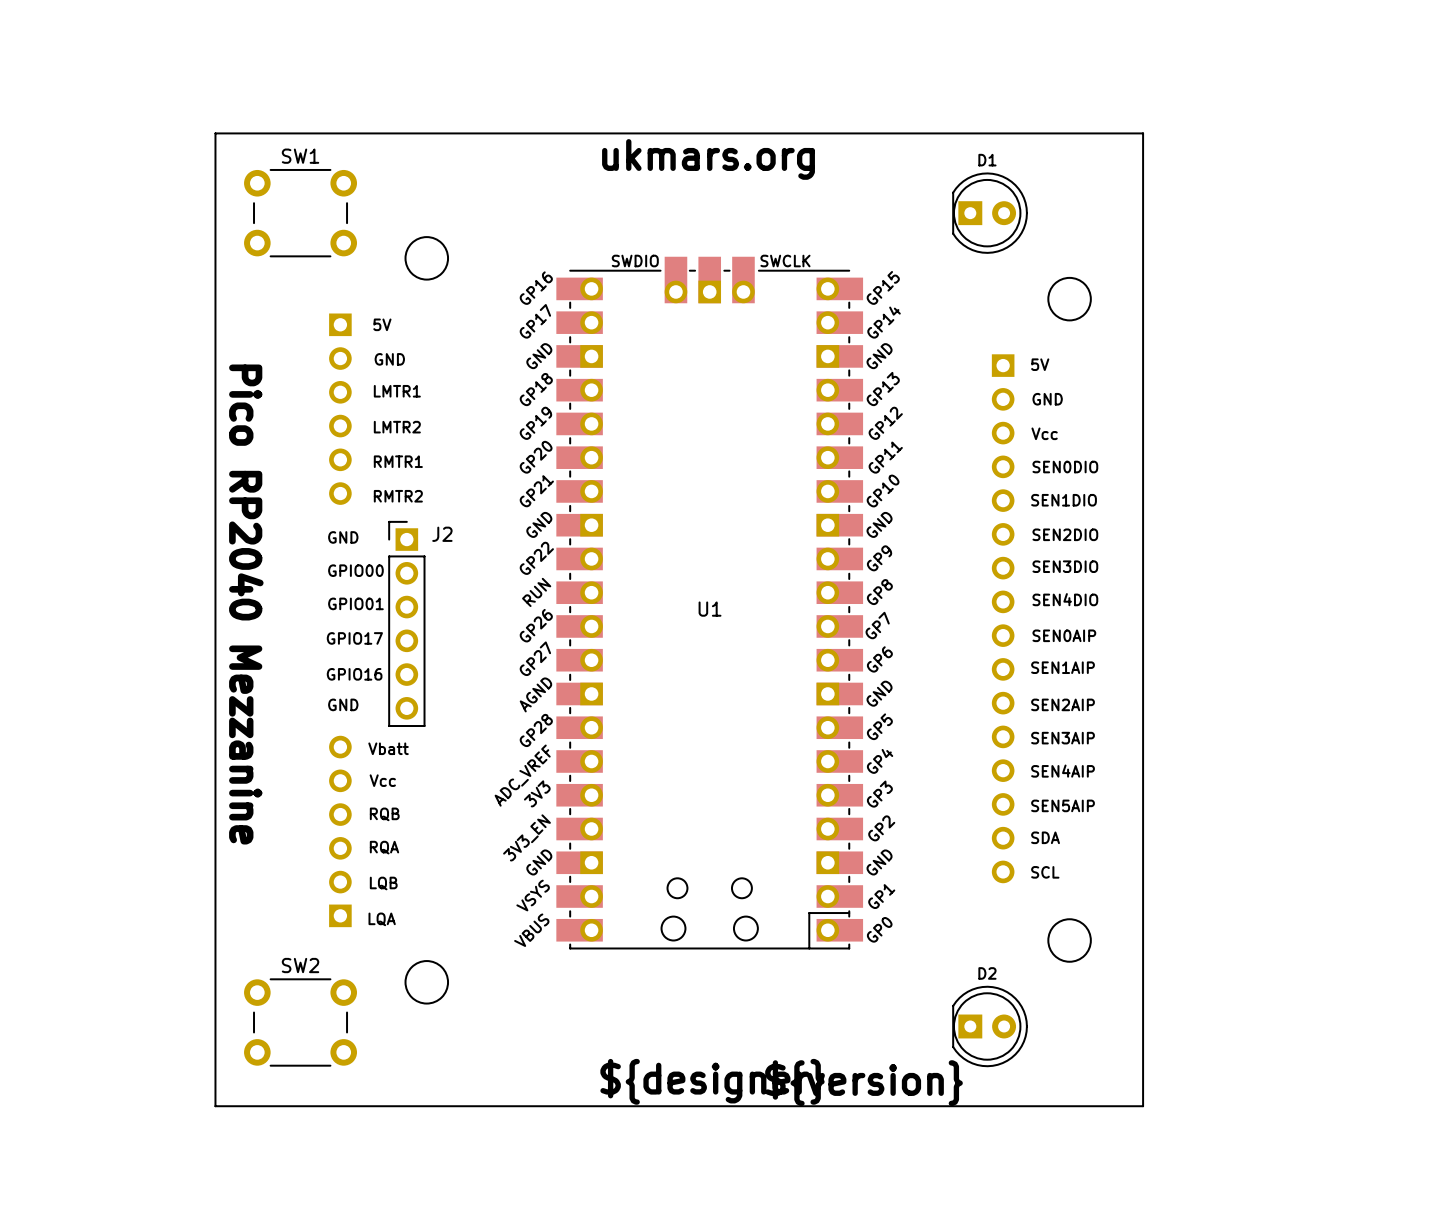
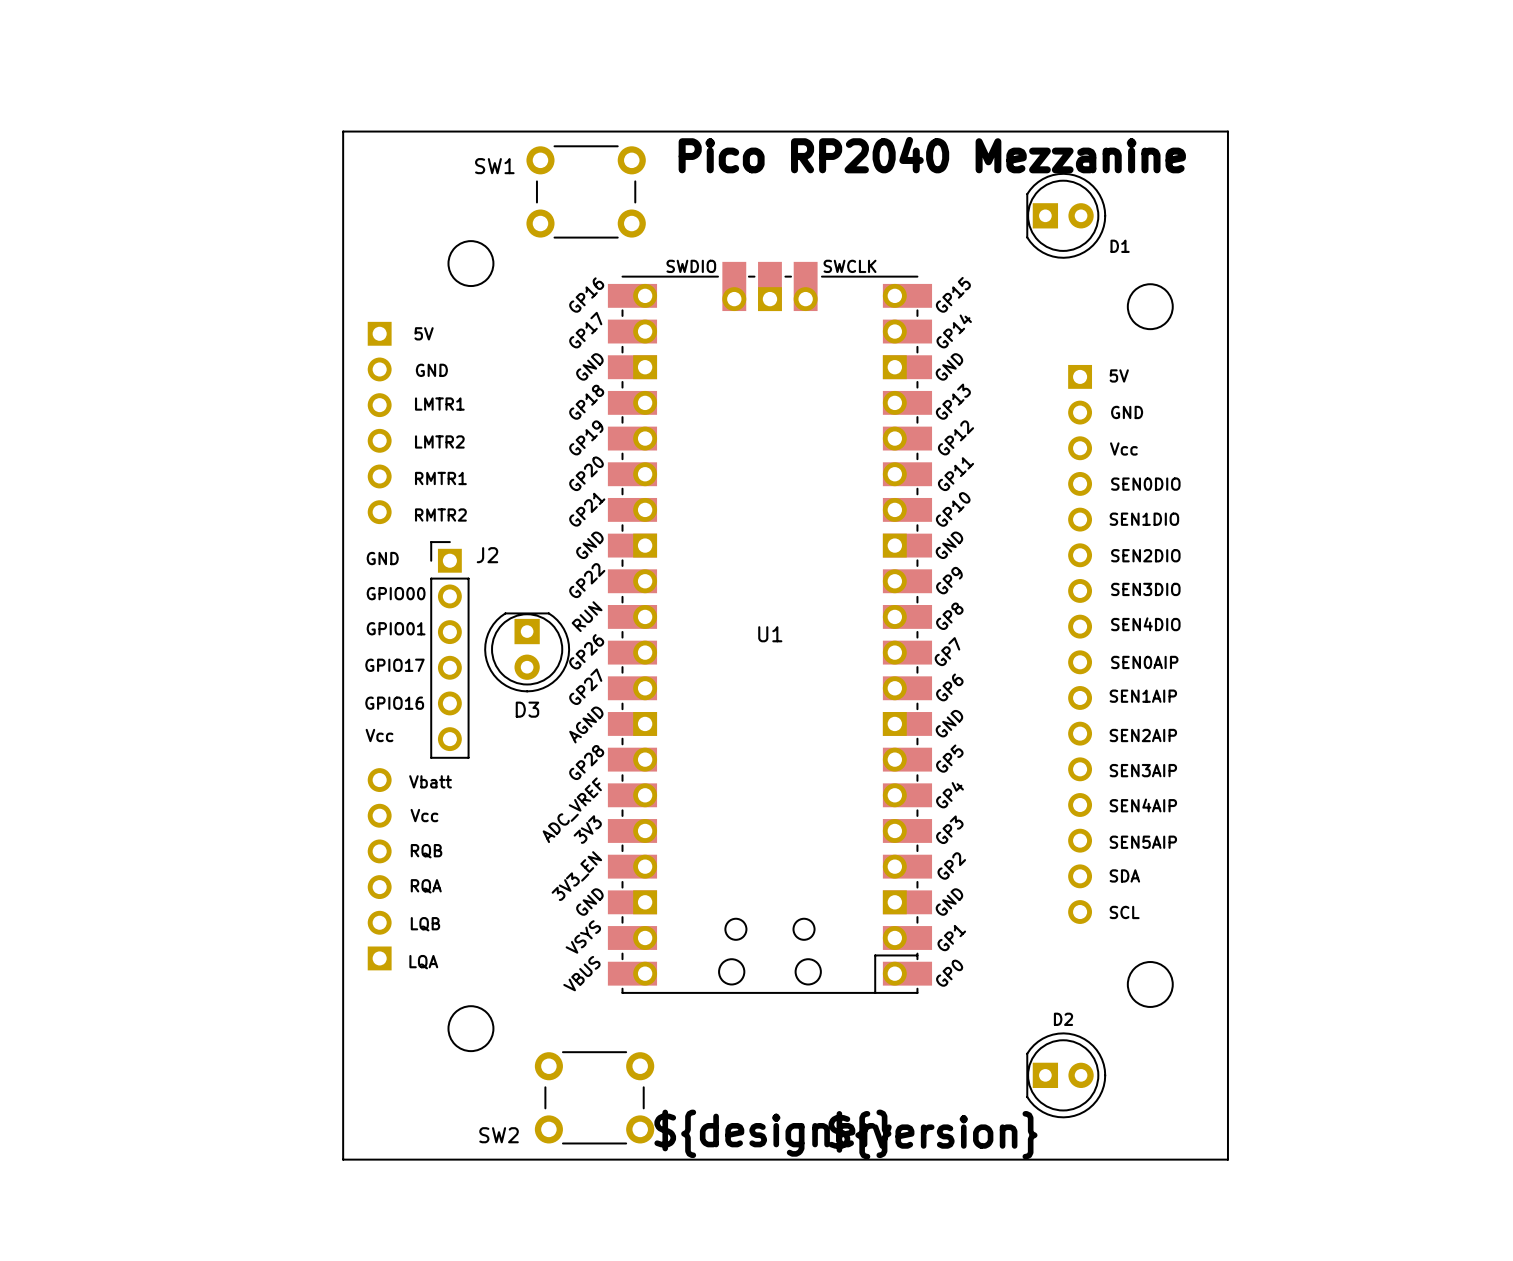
board edge: (305, 133) (215, 133) (215, 1106) (305, 1106) -> (343, 131) (343, 1159)
text: none -> Pico RP2040 Mezzanine (932, 155)
SW1 name position: SW1 (300, 156) -> SW1 (494, 166)
text: ukmars.org (708, 159) -> none
D1 name position: D1 (987, 160) -> D1 (1120, 246)
SW1 position: (300, 213) -> (586, 191)
text: Pico RP2040 Mezzanine (246, 604) -> none
D3: none -> (527, 652)
text: GND (343, 704) -> Vcc (379, 735)
SW2 name position: SW2 (300, 965) -> SW2 (499, 1135)
SW2 position: (300, 1022) -> (594, 1097)

